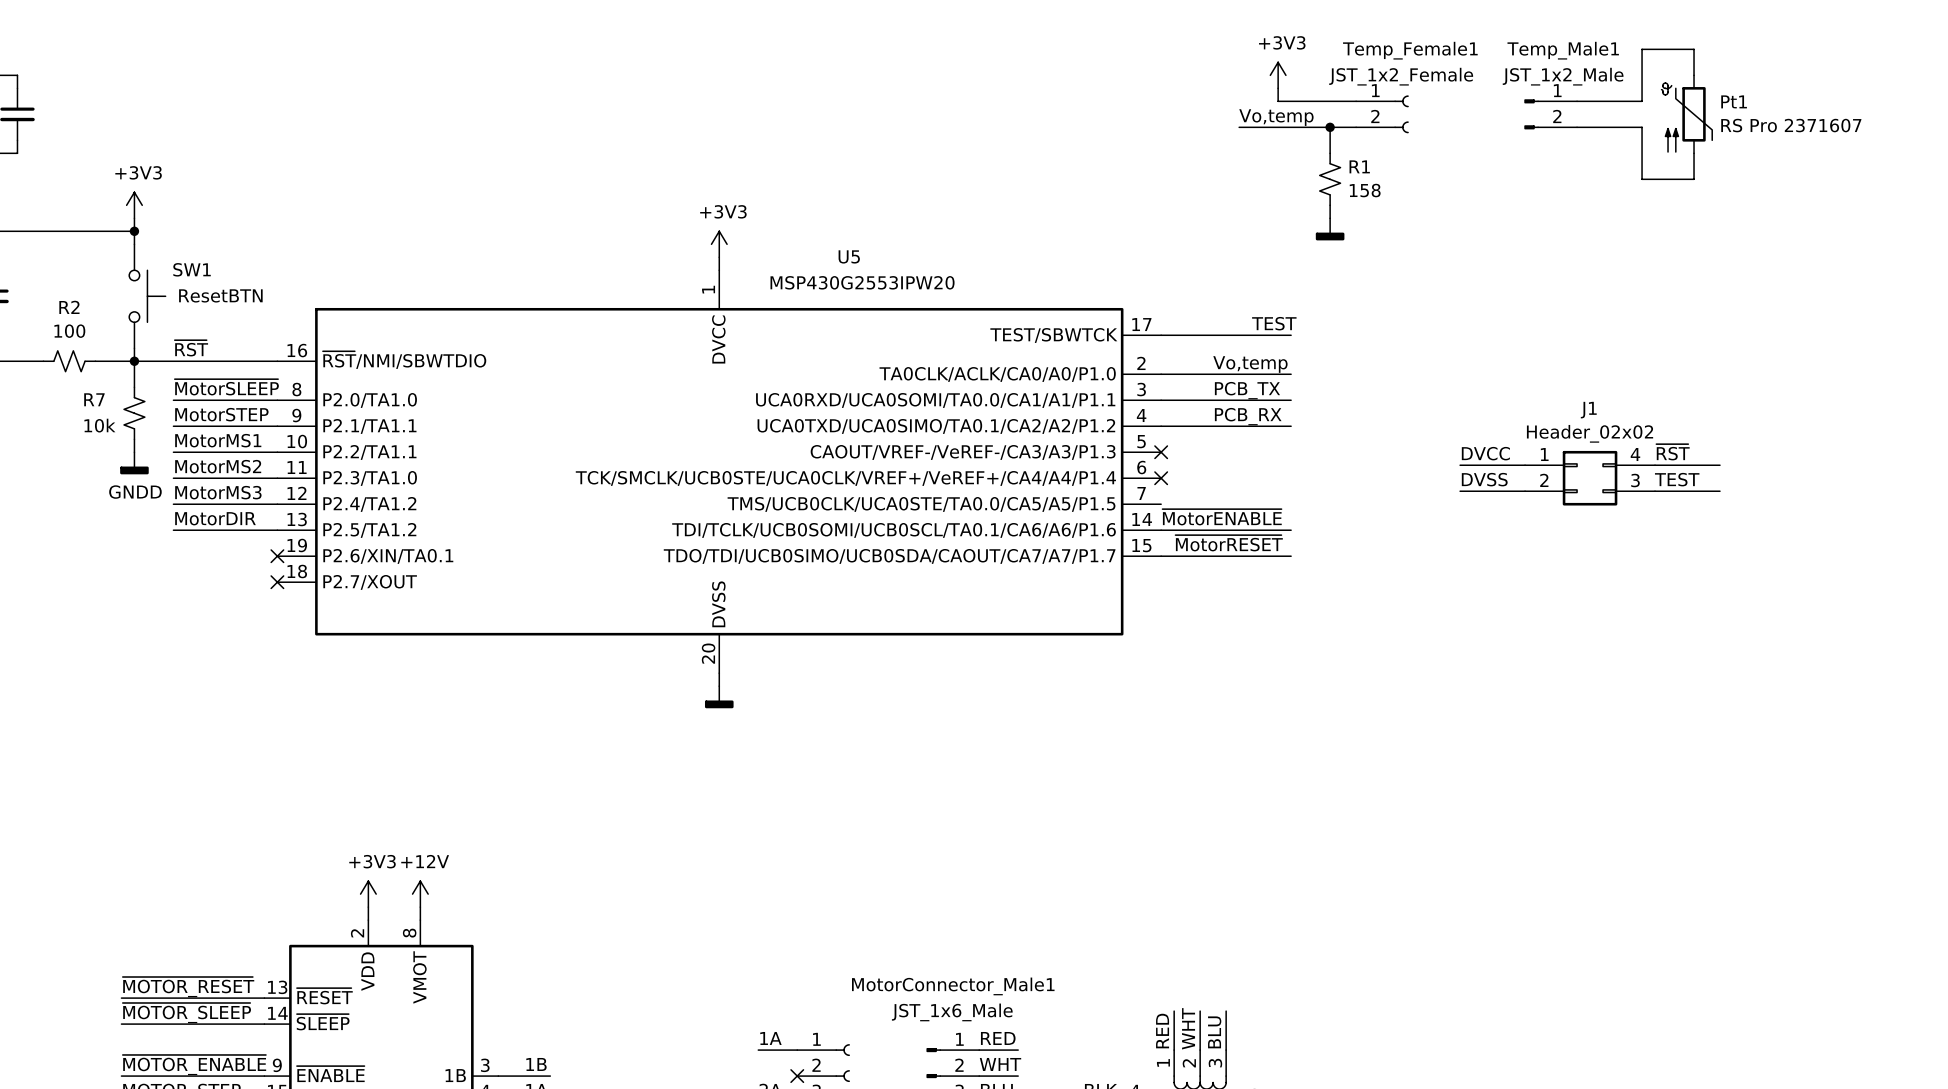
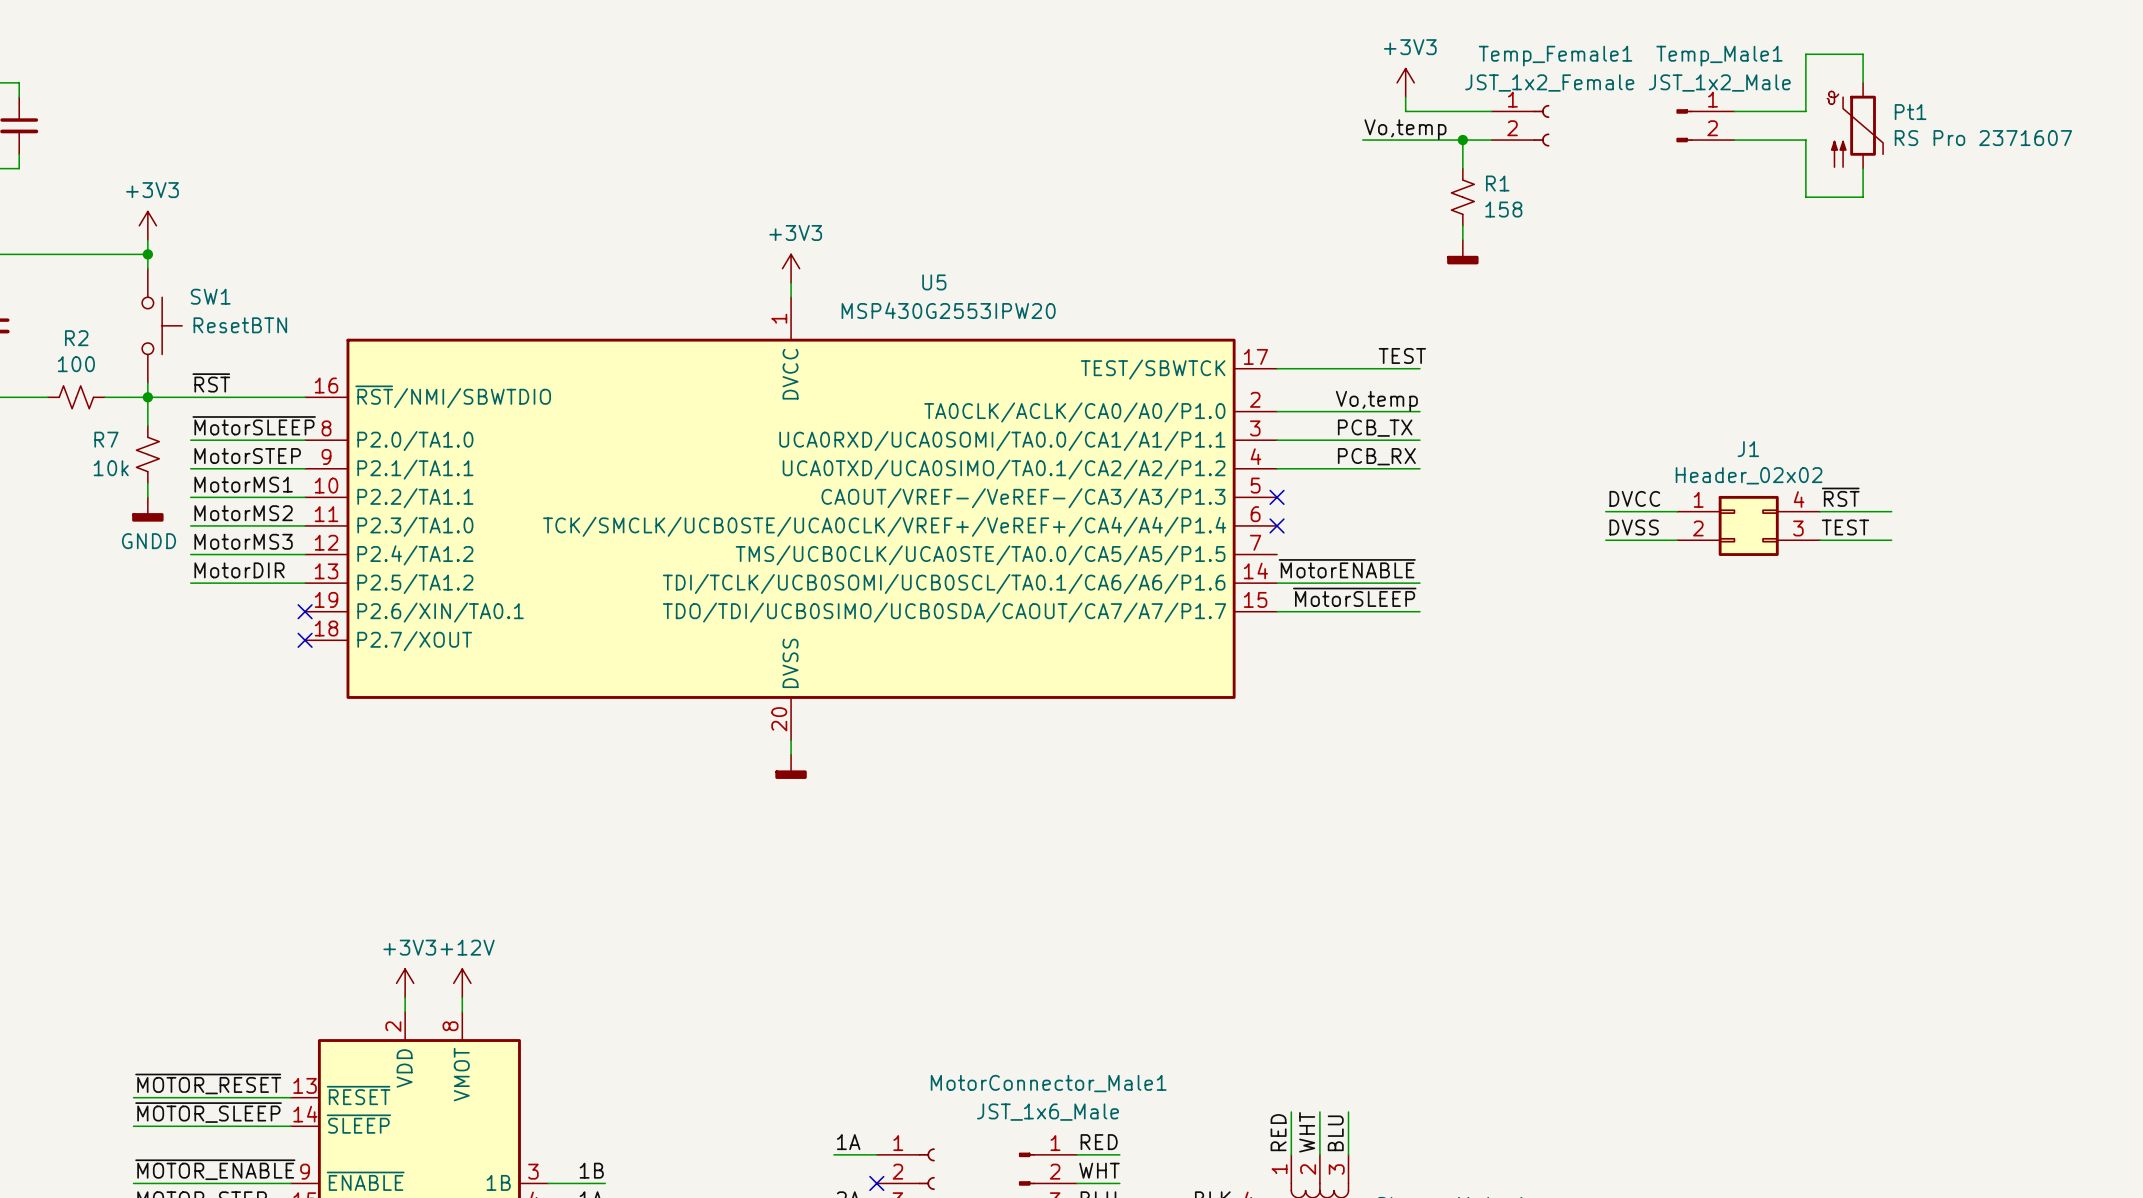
label: ~{MotorRESET} (1229, 543) -> ~{MotorSLEEP} (1354, 597)

